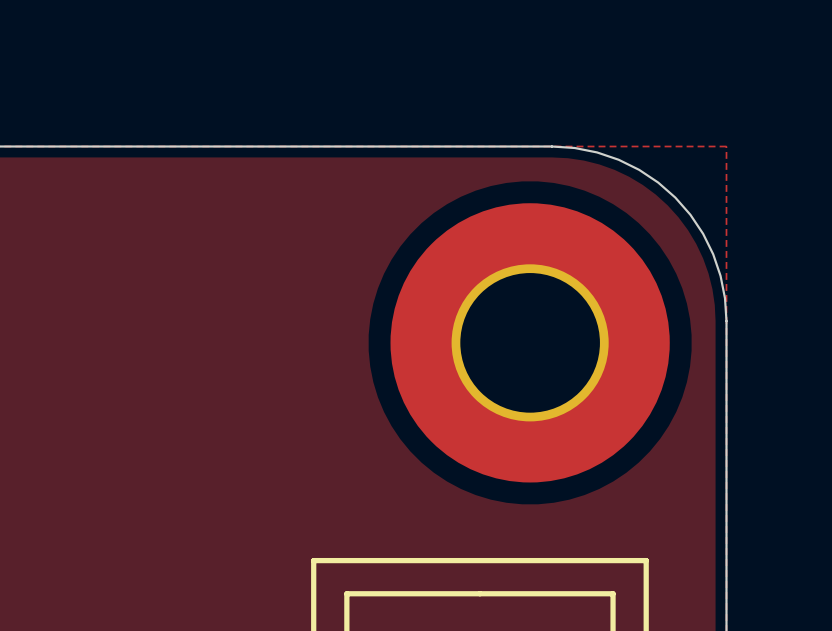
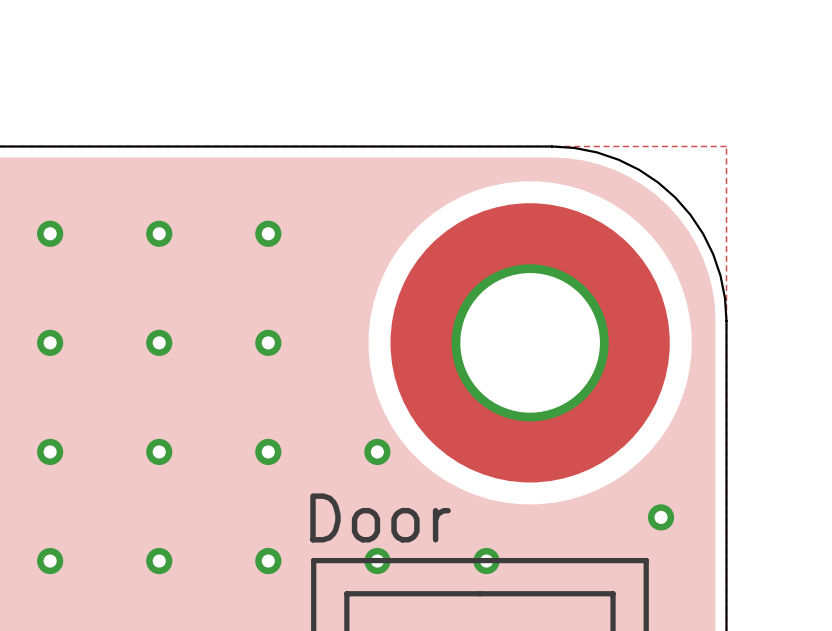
via: none -> (50, 233)
via: none -> (159, 233)
via: none -> (268, 233)
via: none -> (50, 342)
via: none -> (159, 342)
via: none -> (268, 342)
via: none -> (50, 451)
via: none -> (159, 451)
via: none -> (268, 451)
via: none -> (377, 451)
text: none -> Door (380, 517)
via: none -> (661, 517)
via: none -> (50, 561)
via: none -> (159, 561)
via: none -> (268, 561)
via: none -> (377, 561)
via: none -> (486, 561)

